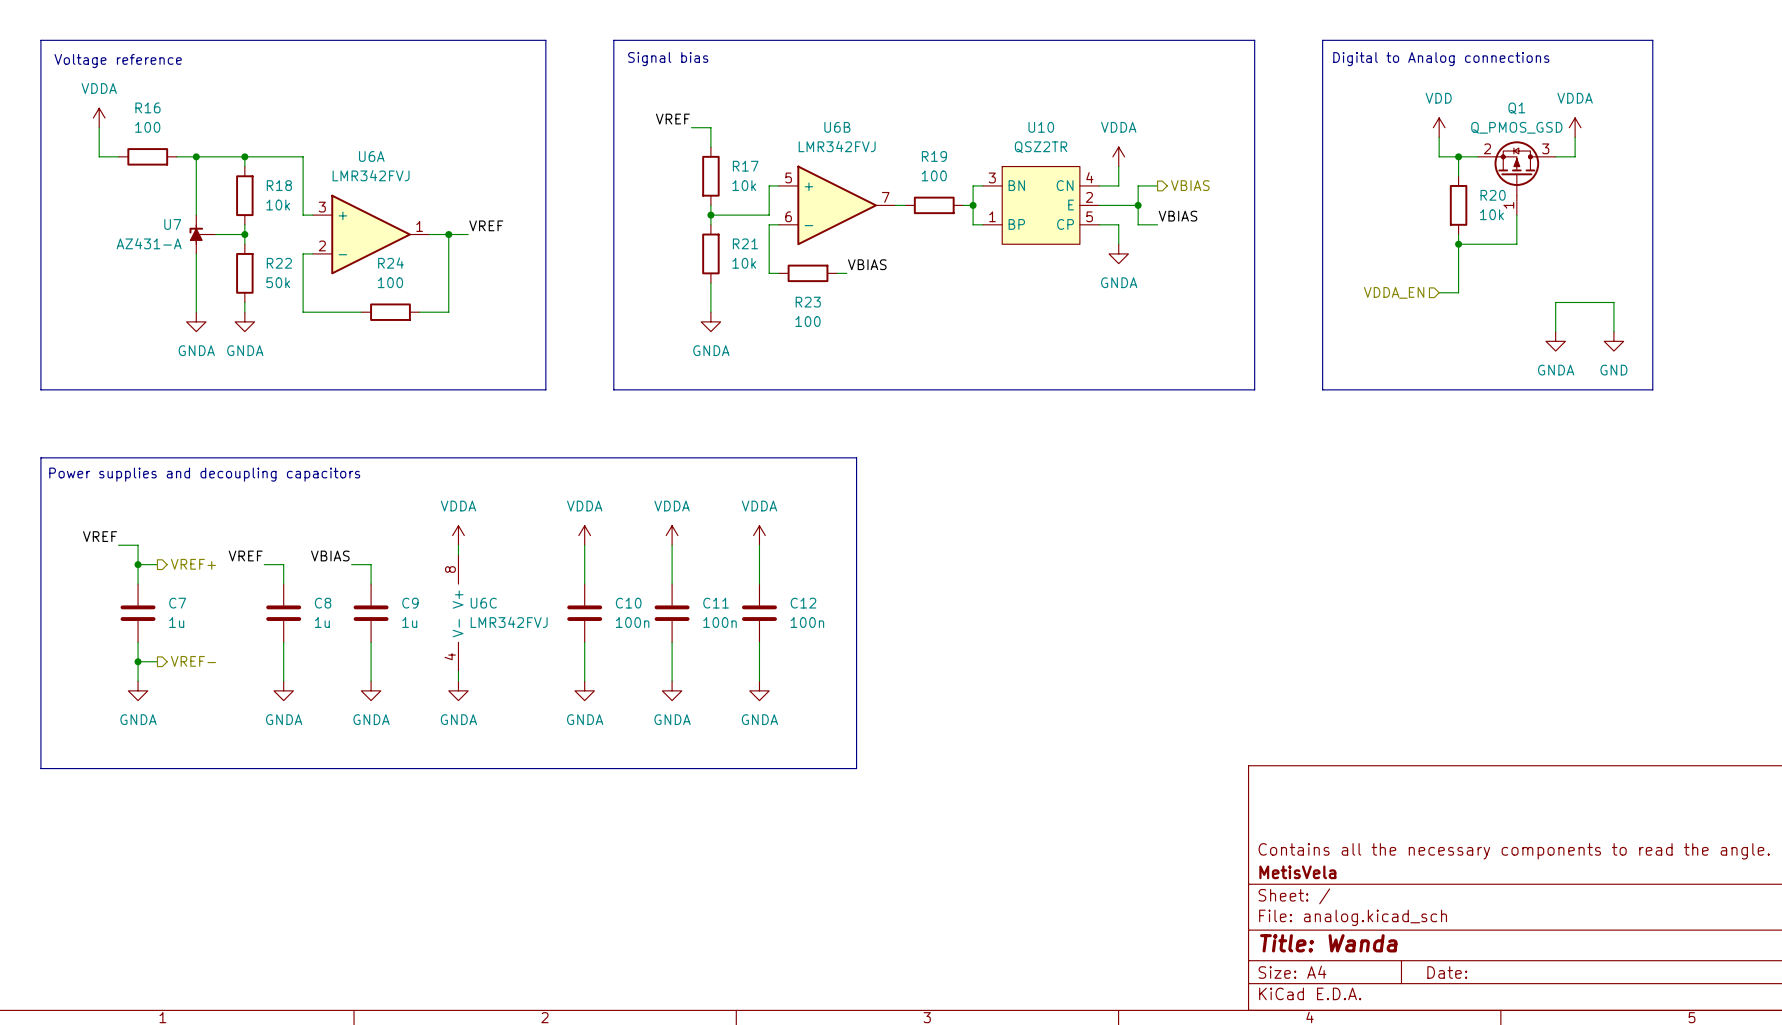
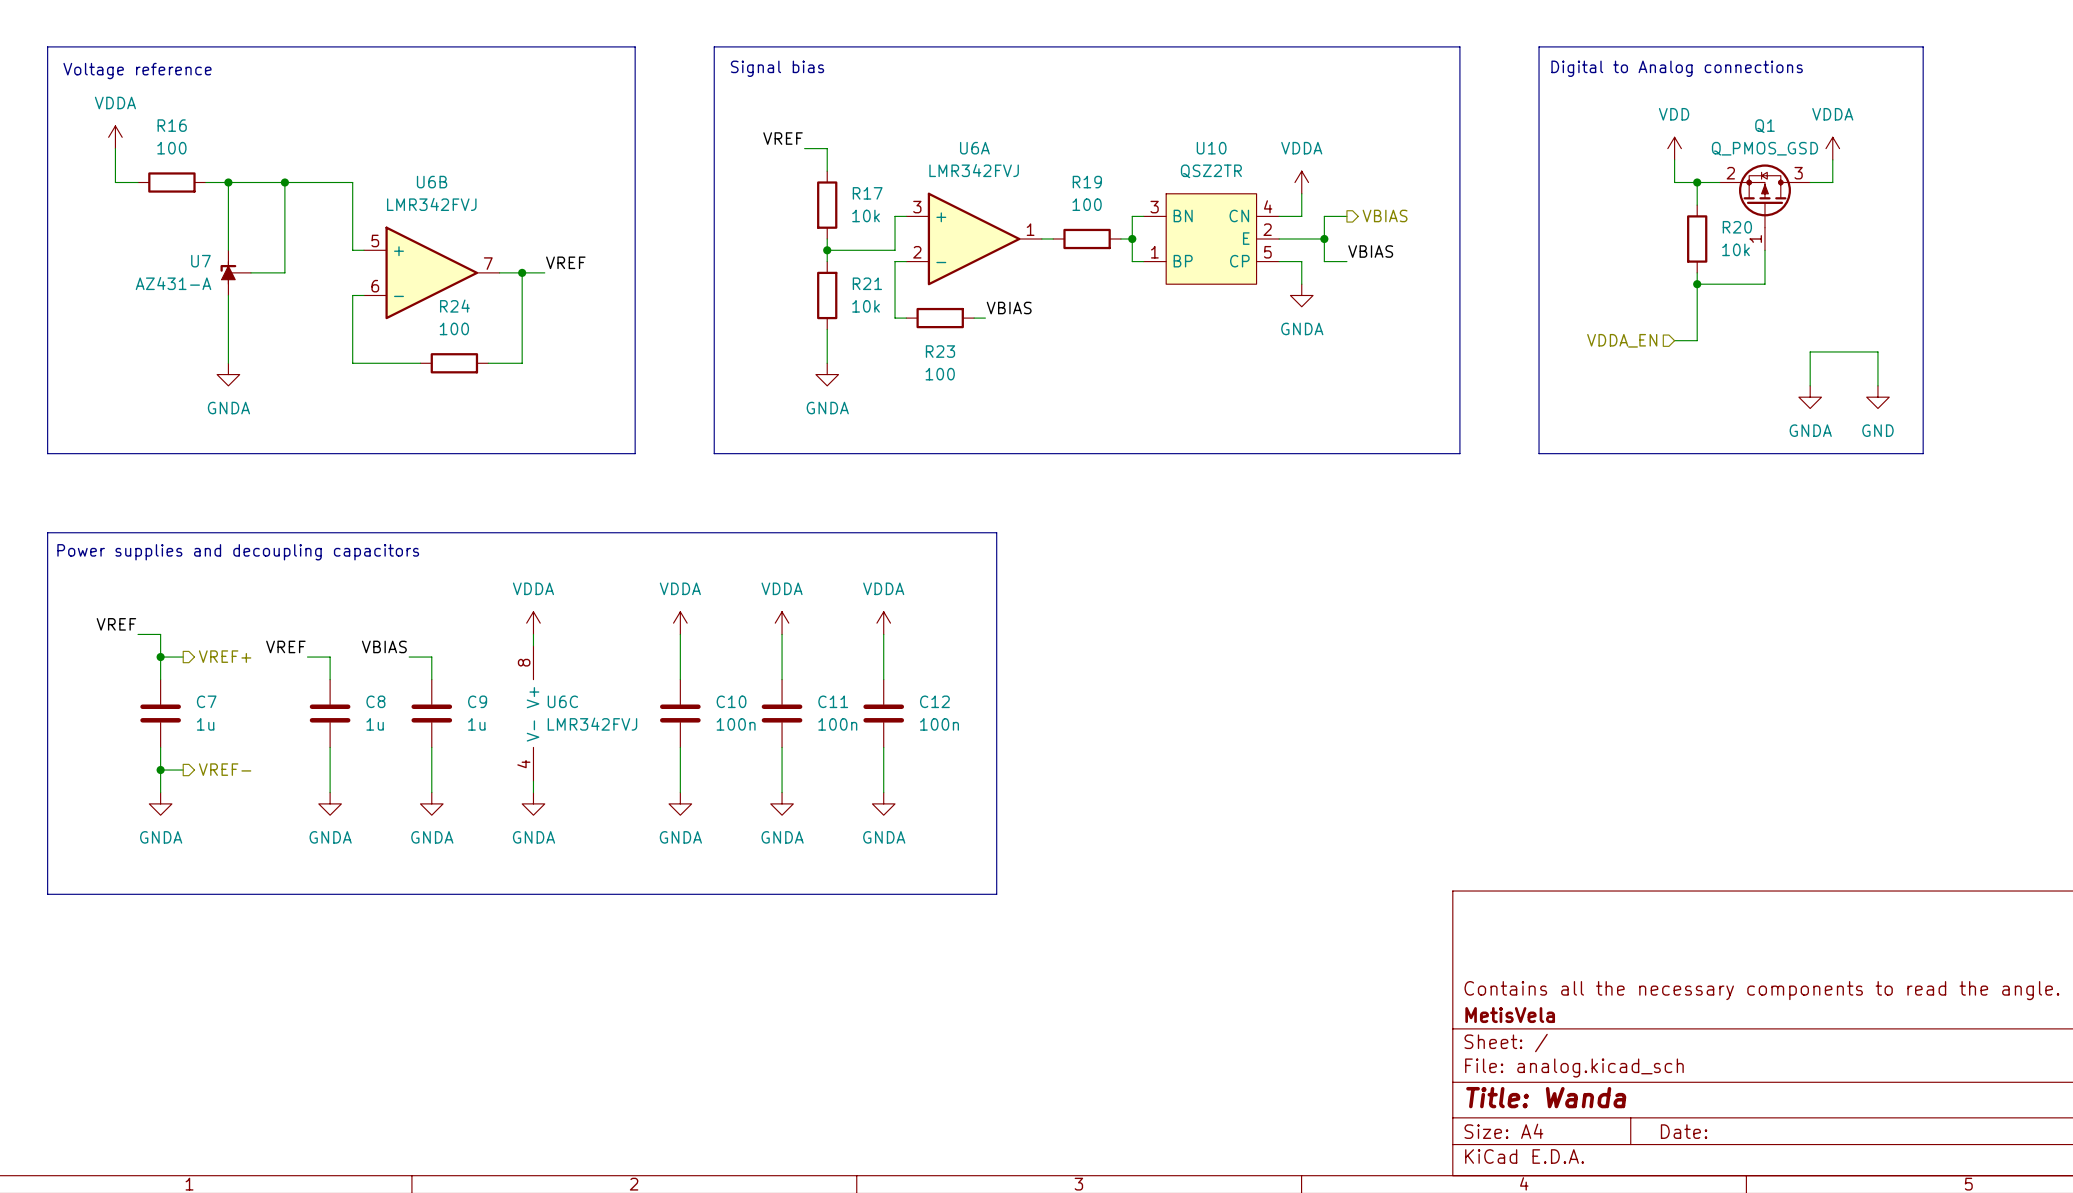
wire: none -> (284, 193) (284, 261)
R18: 10k (244, 195) -> none
U6B position: (837, 205) -> (431, 272)
wire: (244, 234) (244, 244) -> none
junction: (244, 234) -> none
U6A position: (371, 234) -> (974, 238)
R22: 50k (244, 273) -> none
wire: (244, 302) (244, 312) -> none
power symbol: GNDA (244, 321) -> none

